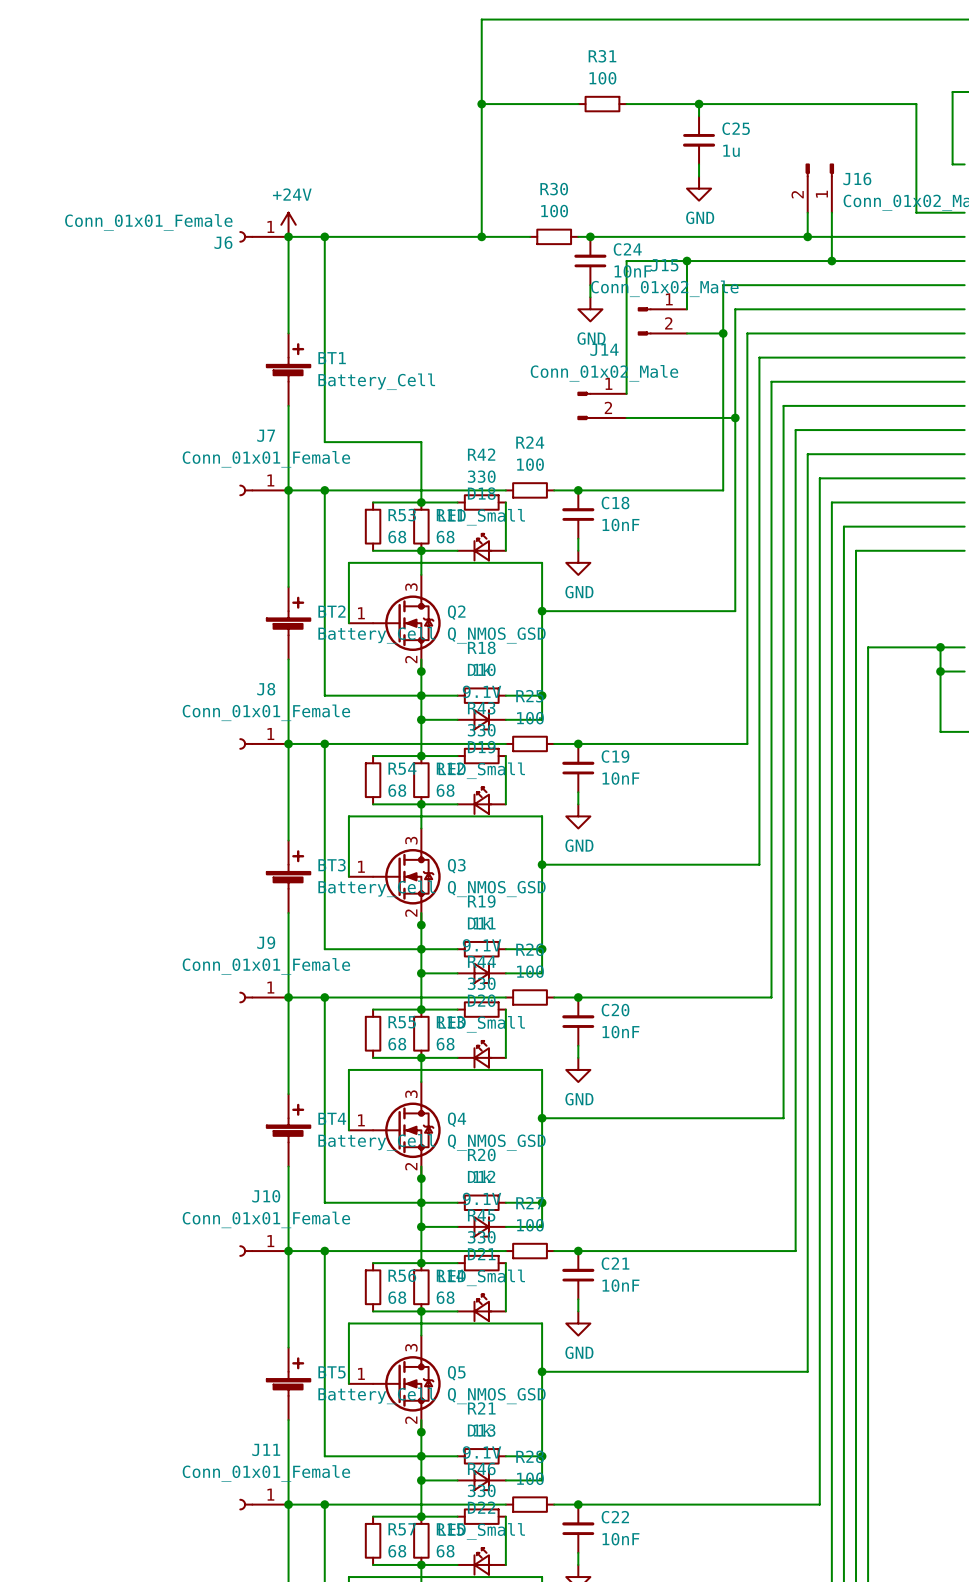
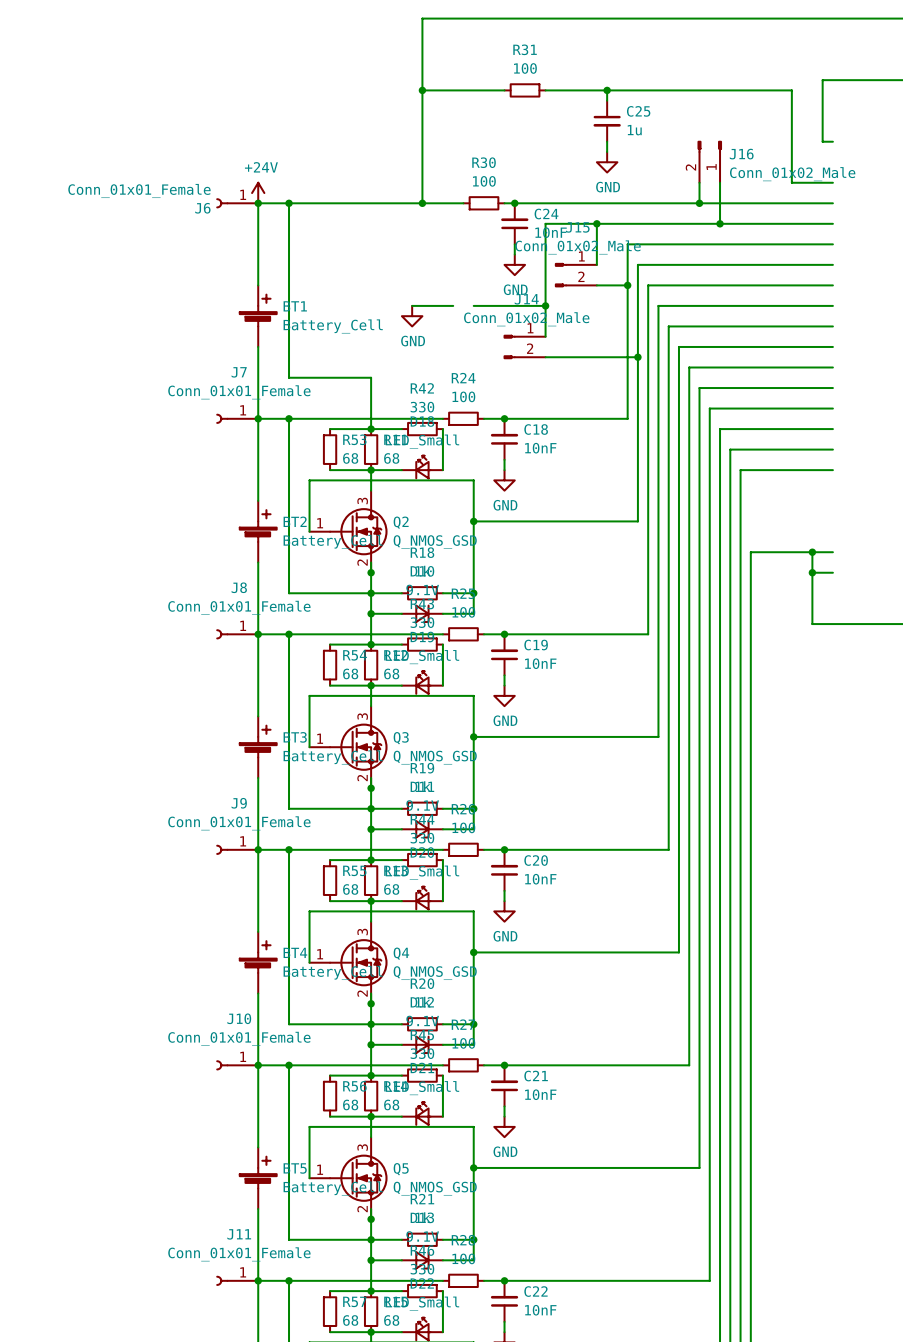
wire: none -> (412, 305) (453, 305)
wire: none -> (473, 305) (545, 305)
junction: none -> (545, 305)
power symbol: none -> GND (412, 316)

